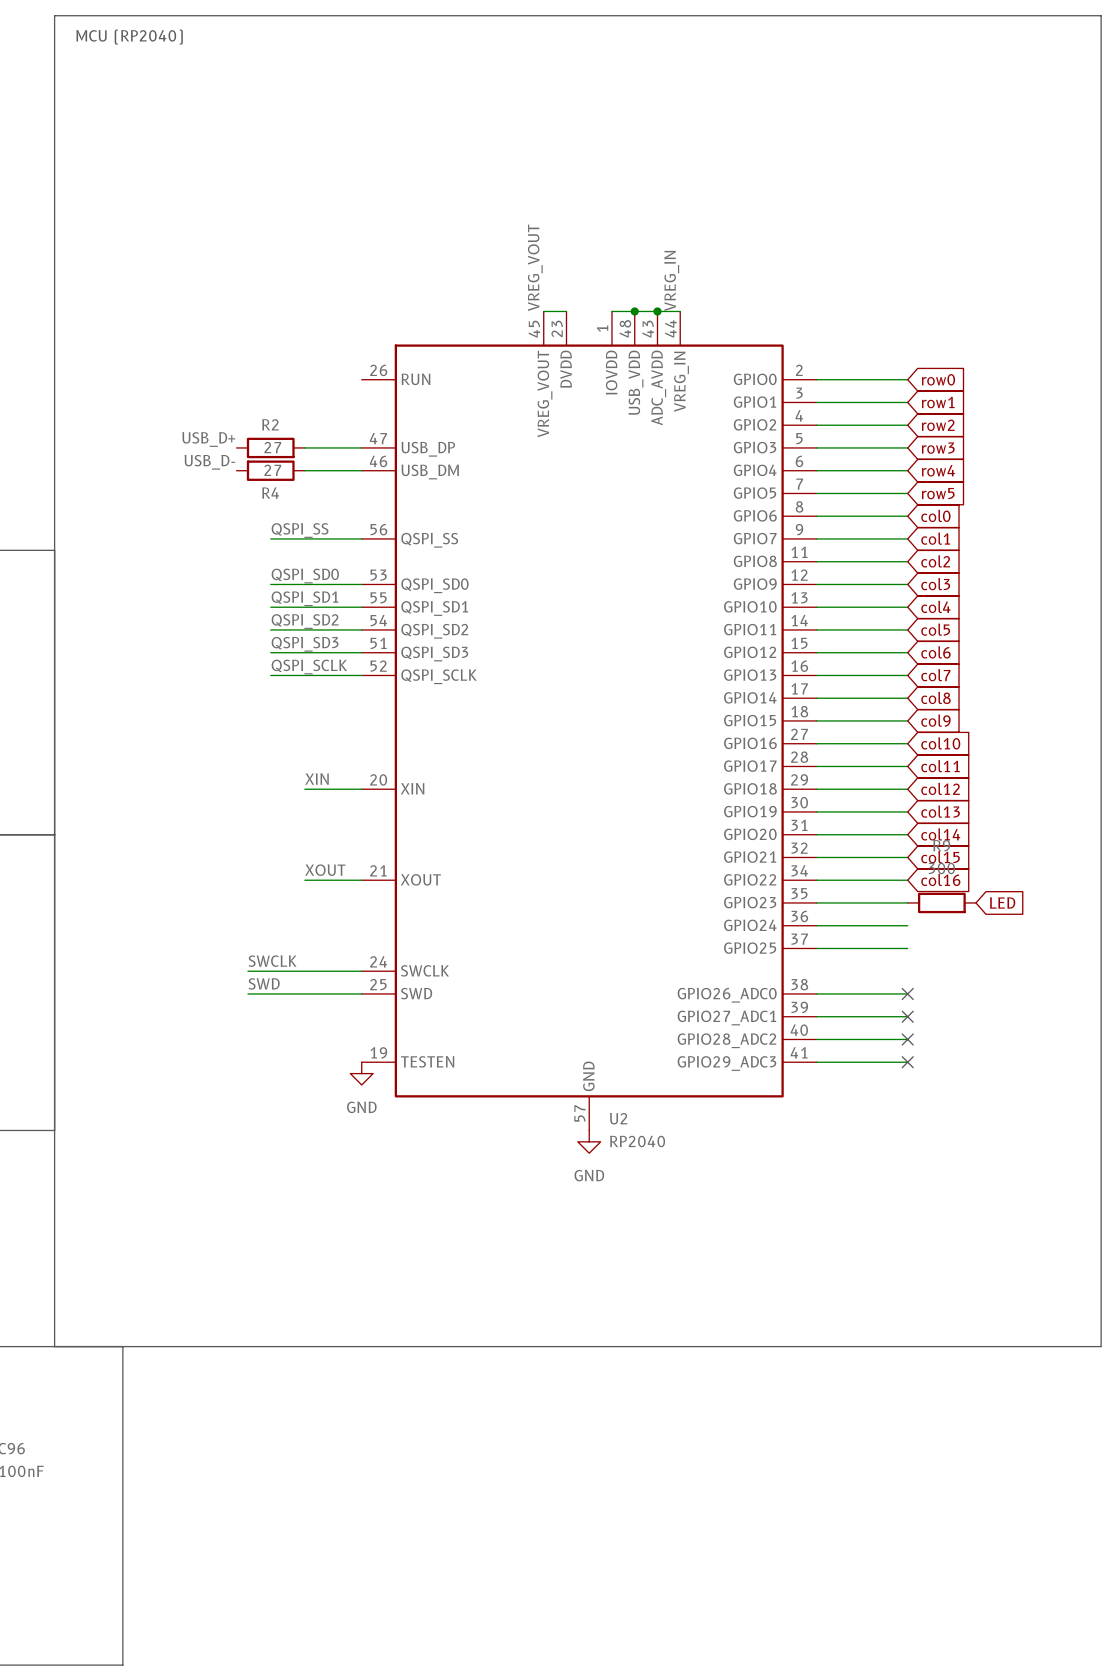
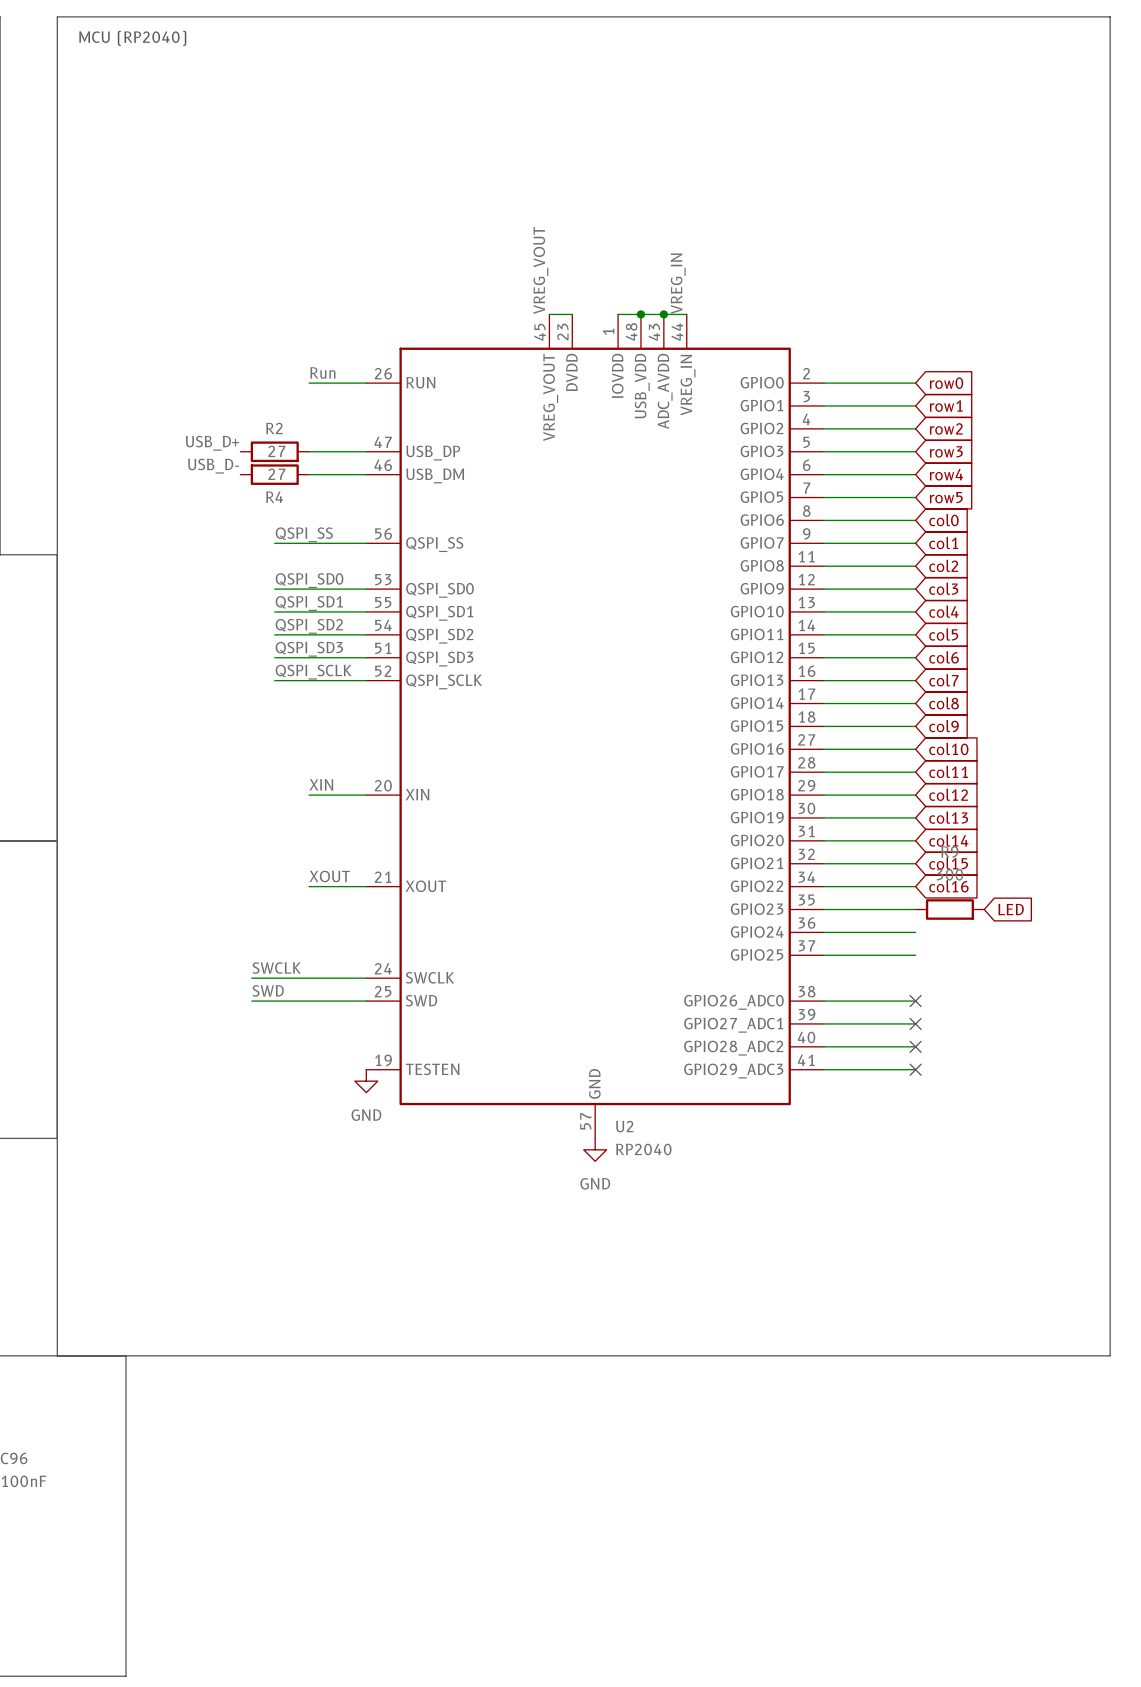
label: none -> Run (322, 372)
wire: none -> (309, 383) (366, 383)

